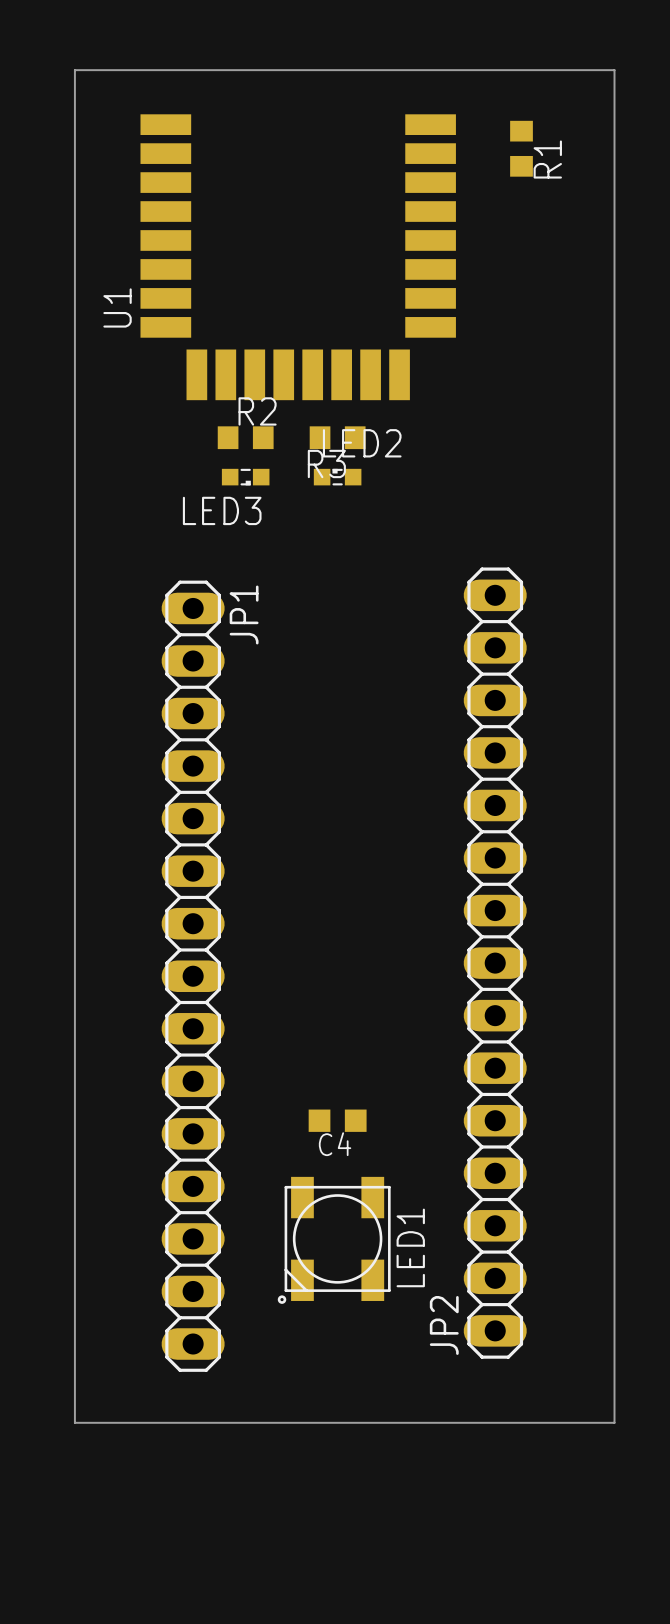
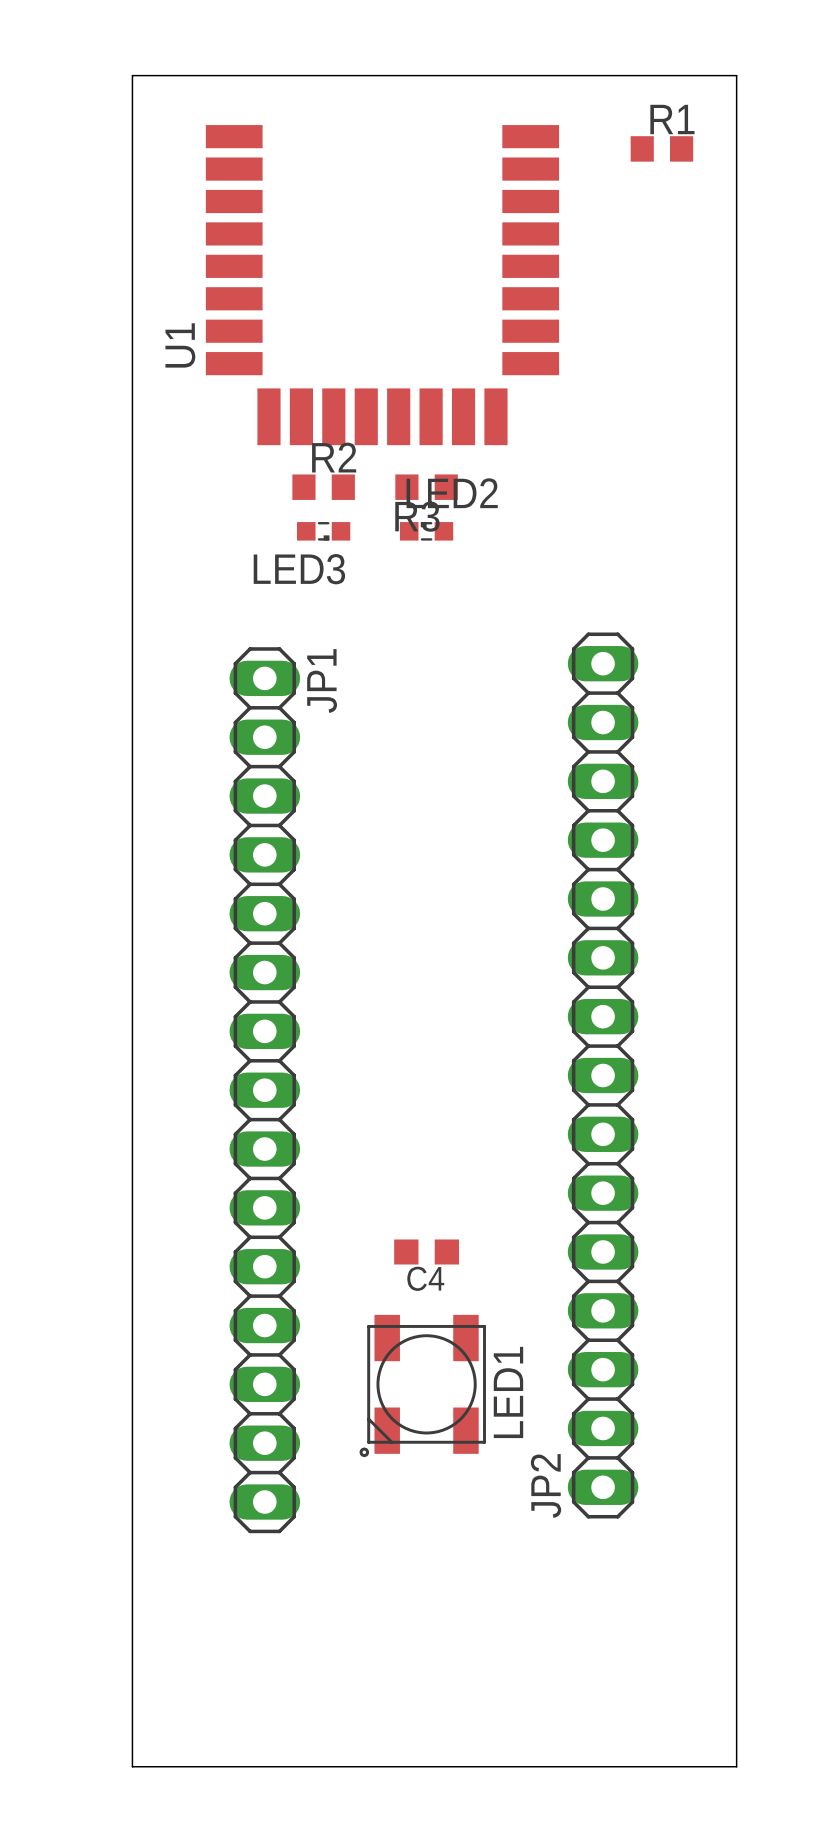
R1 rotation: 0° (521, 148) -> 90° clockwise (661, 148)
R1 name position: R1 (547, 159) -> R1 (672, 119)
board edge: (74, 1422) (614, 1422) -> (132, 1590) (132, 1766) (736, 1766) (736, 1590)

